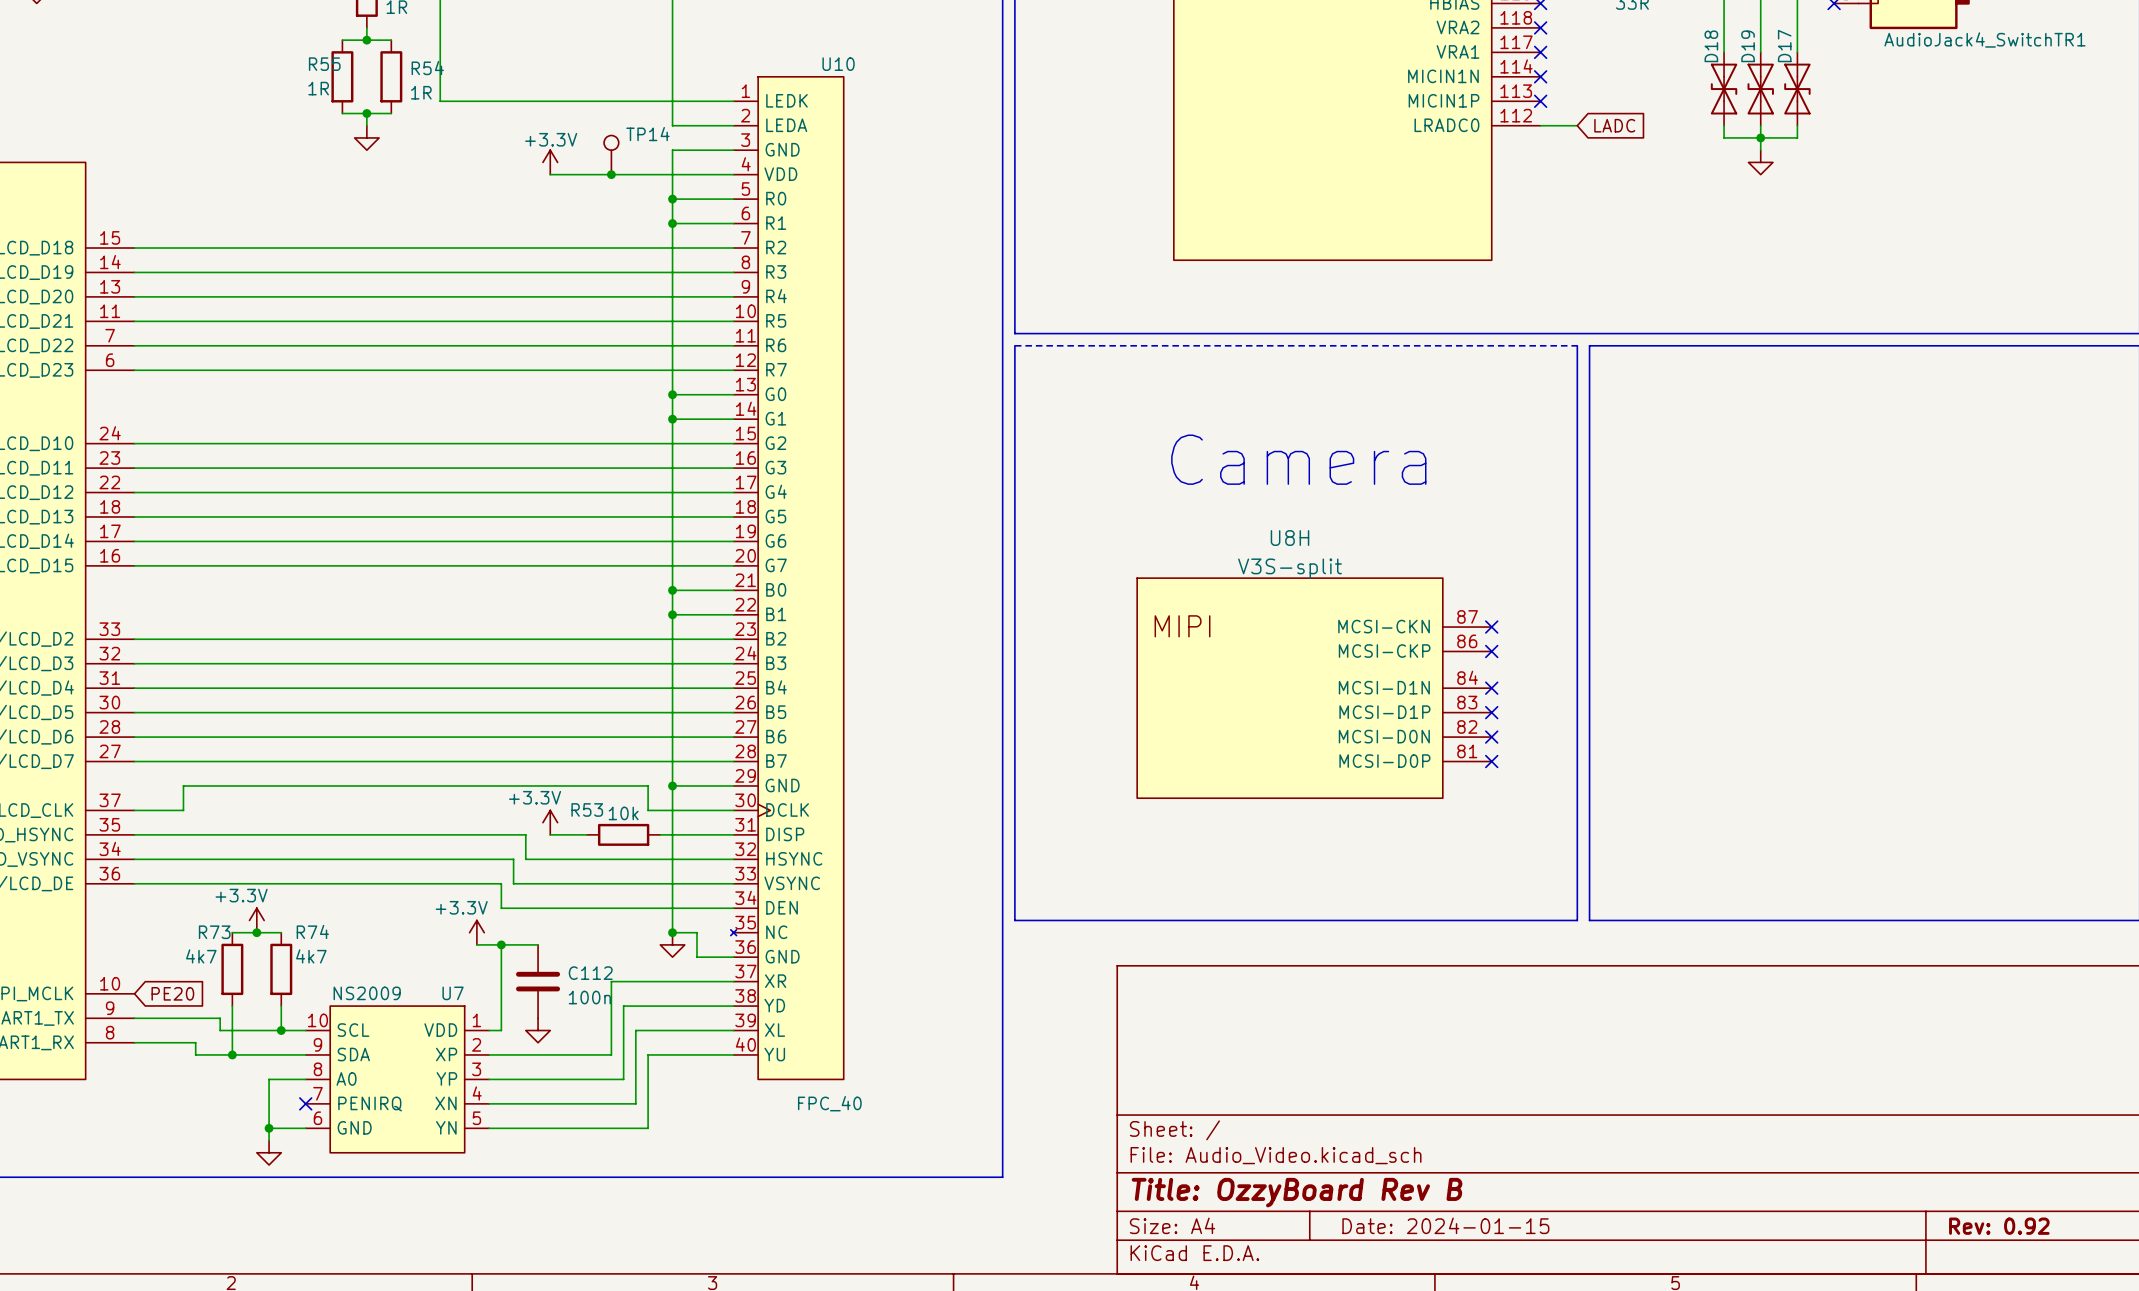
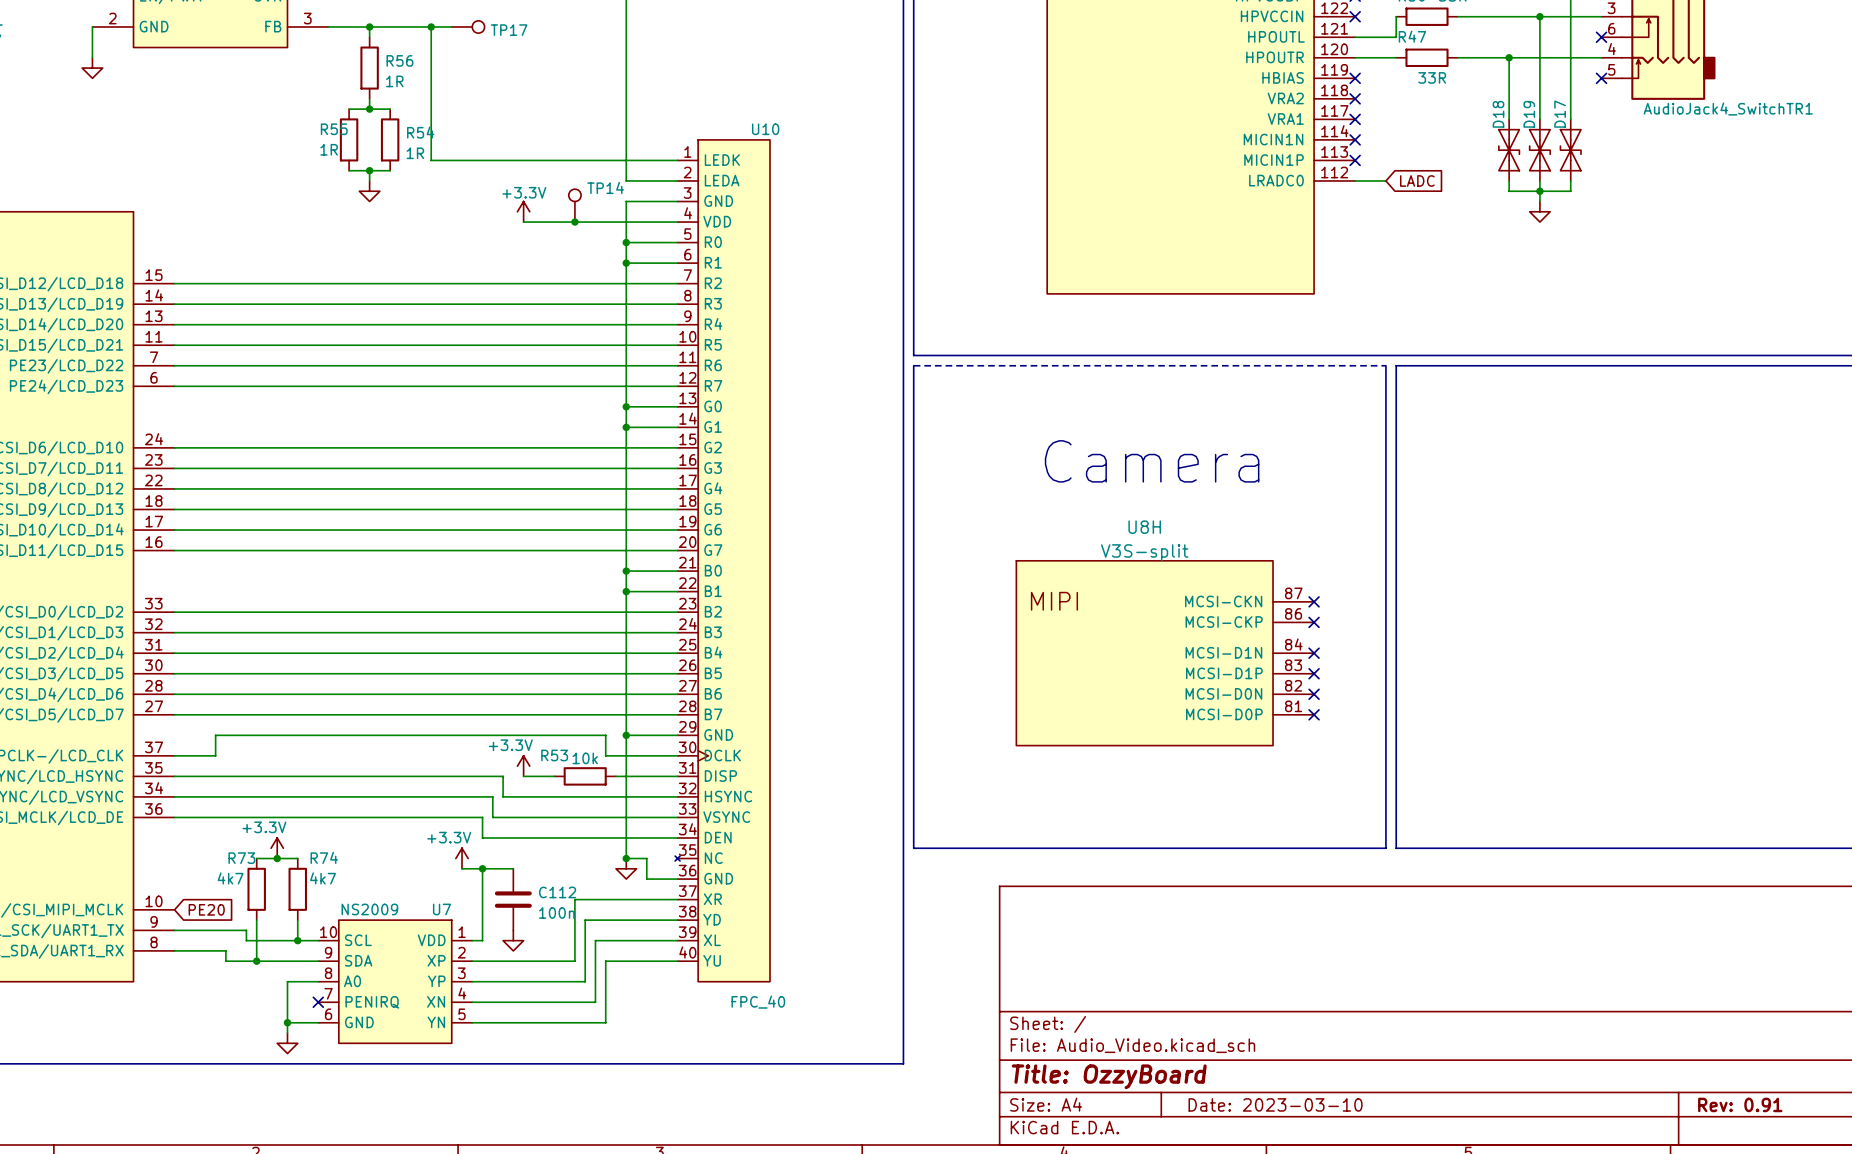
title block: Title: OzzyBoard Rev B (1297, 1192) -> Title: OzzyBoard (1109, 1076)
title block: Date: 2024-01-15 (1445, 1225) -> Date: 2023-03-10 (1275, 1104)
title block: Rev: 0.92 (1999, 1226) -> Rev: 0.91 (1740, 1104)

